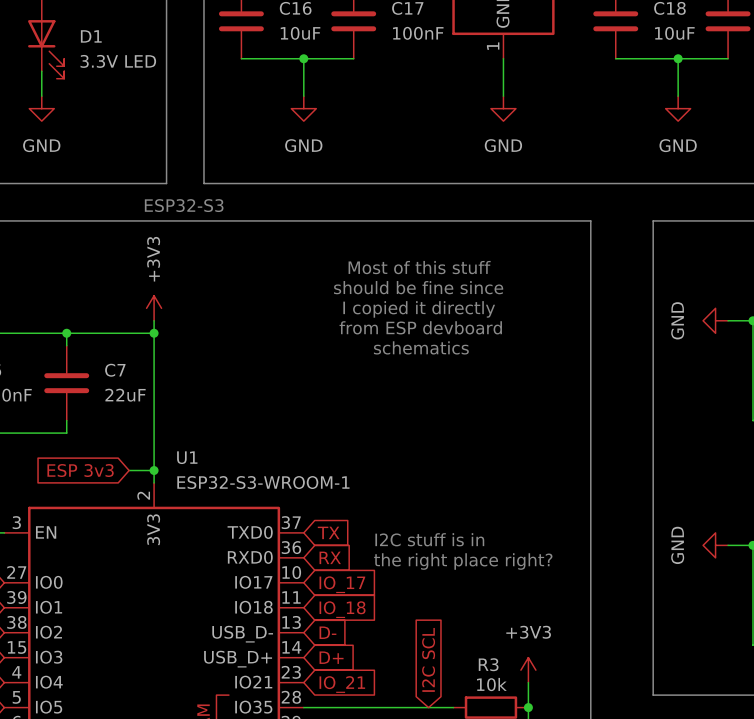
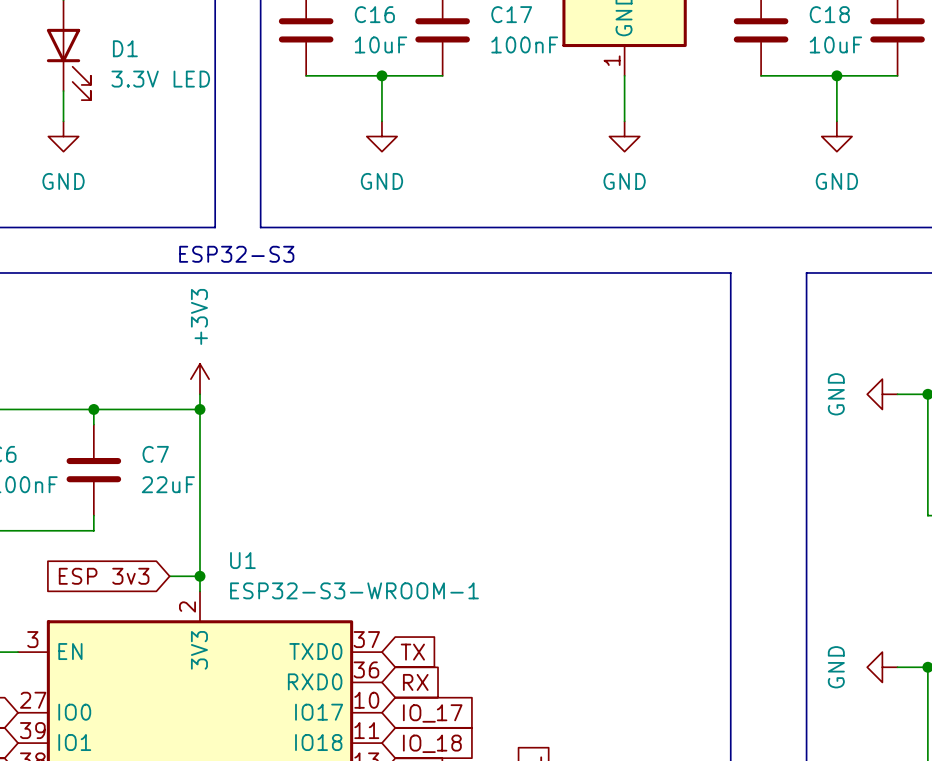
text: Most of this stuff (419, 267) -> none
text: should be fine since (418, 287) -> none
text: I copied it directly (419, 309) -> none
text: from ESP devboard (420, 327) -> none
text: schematics (421, 347) -> none
text: I2C stuff is in (429, 539) -> none
text: the right place right? (463, 561) -> none

